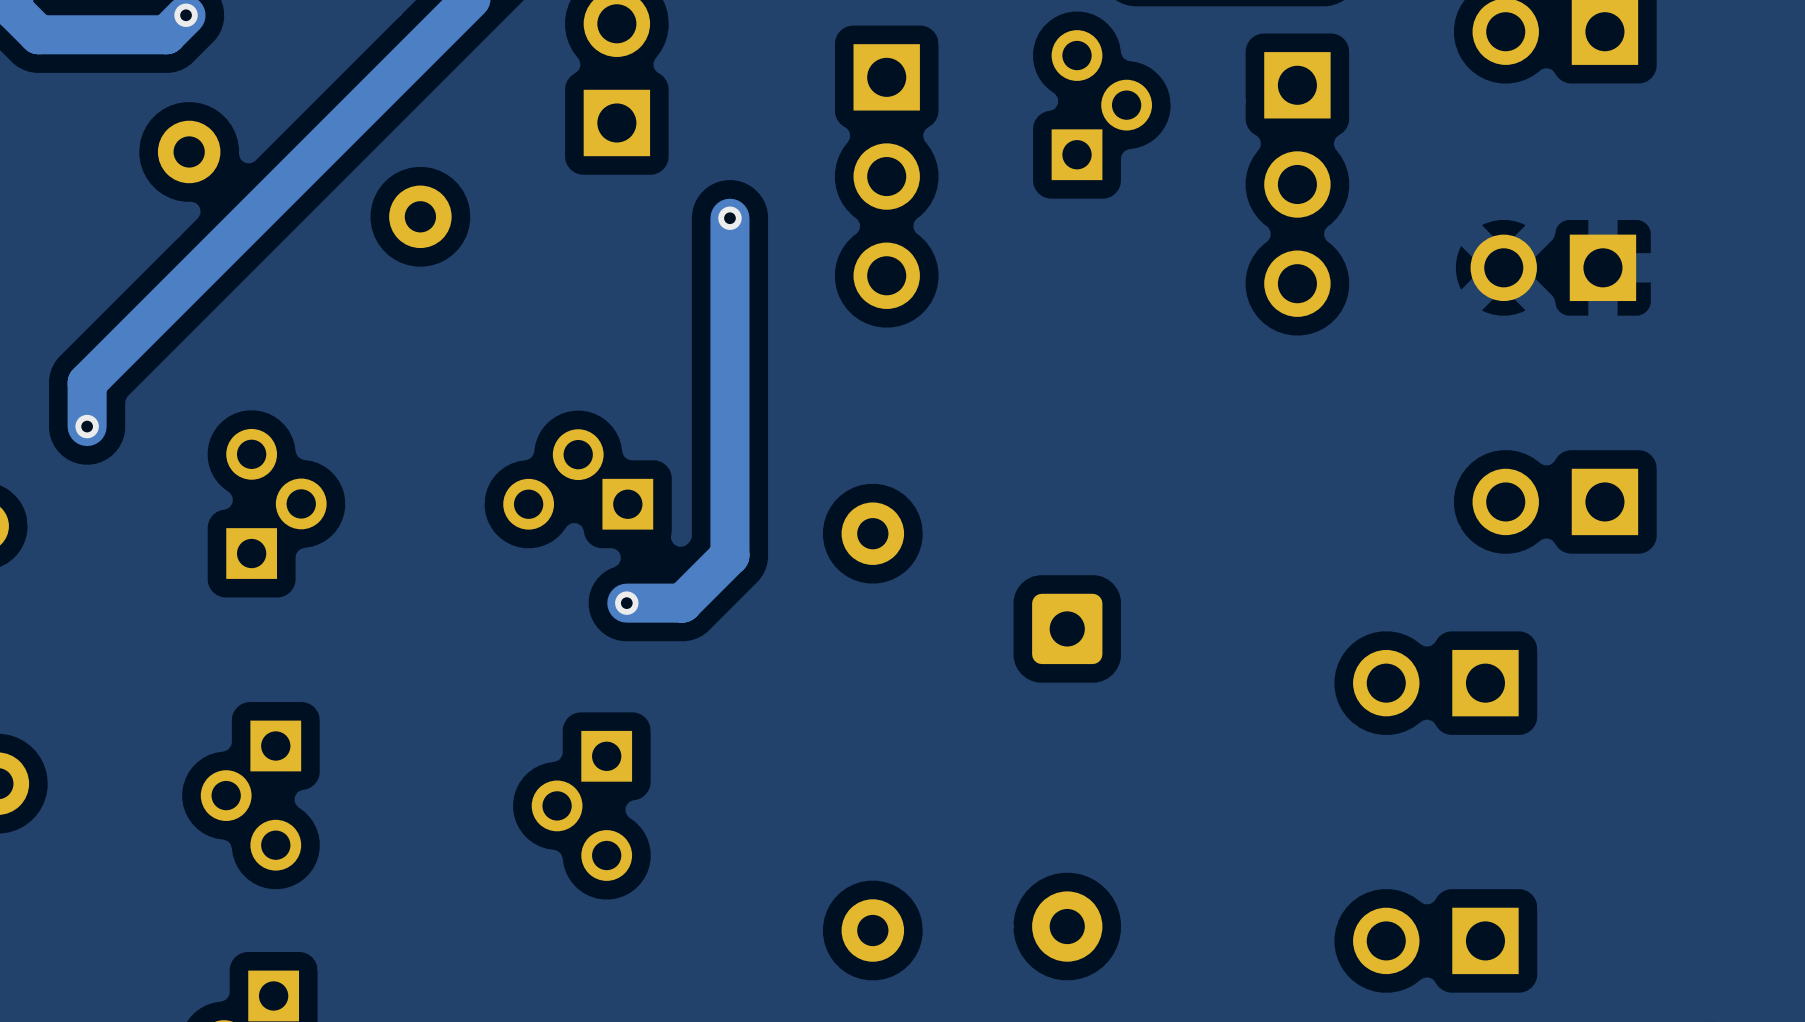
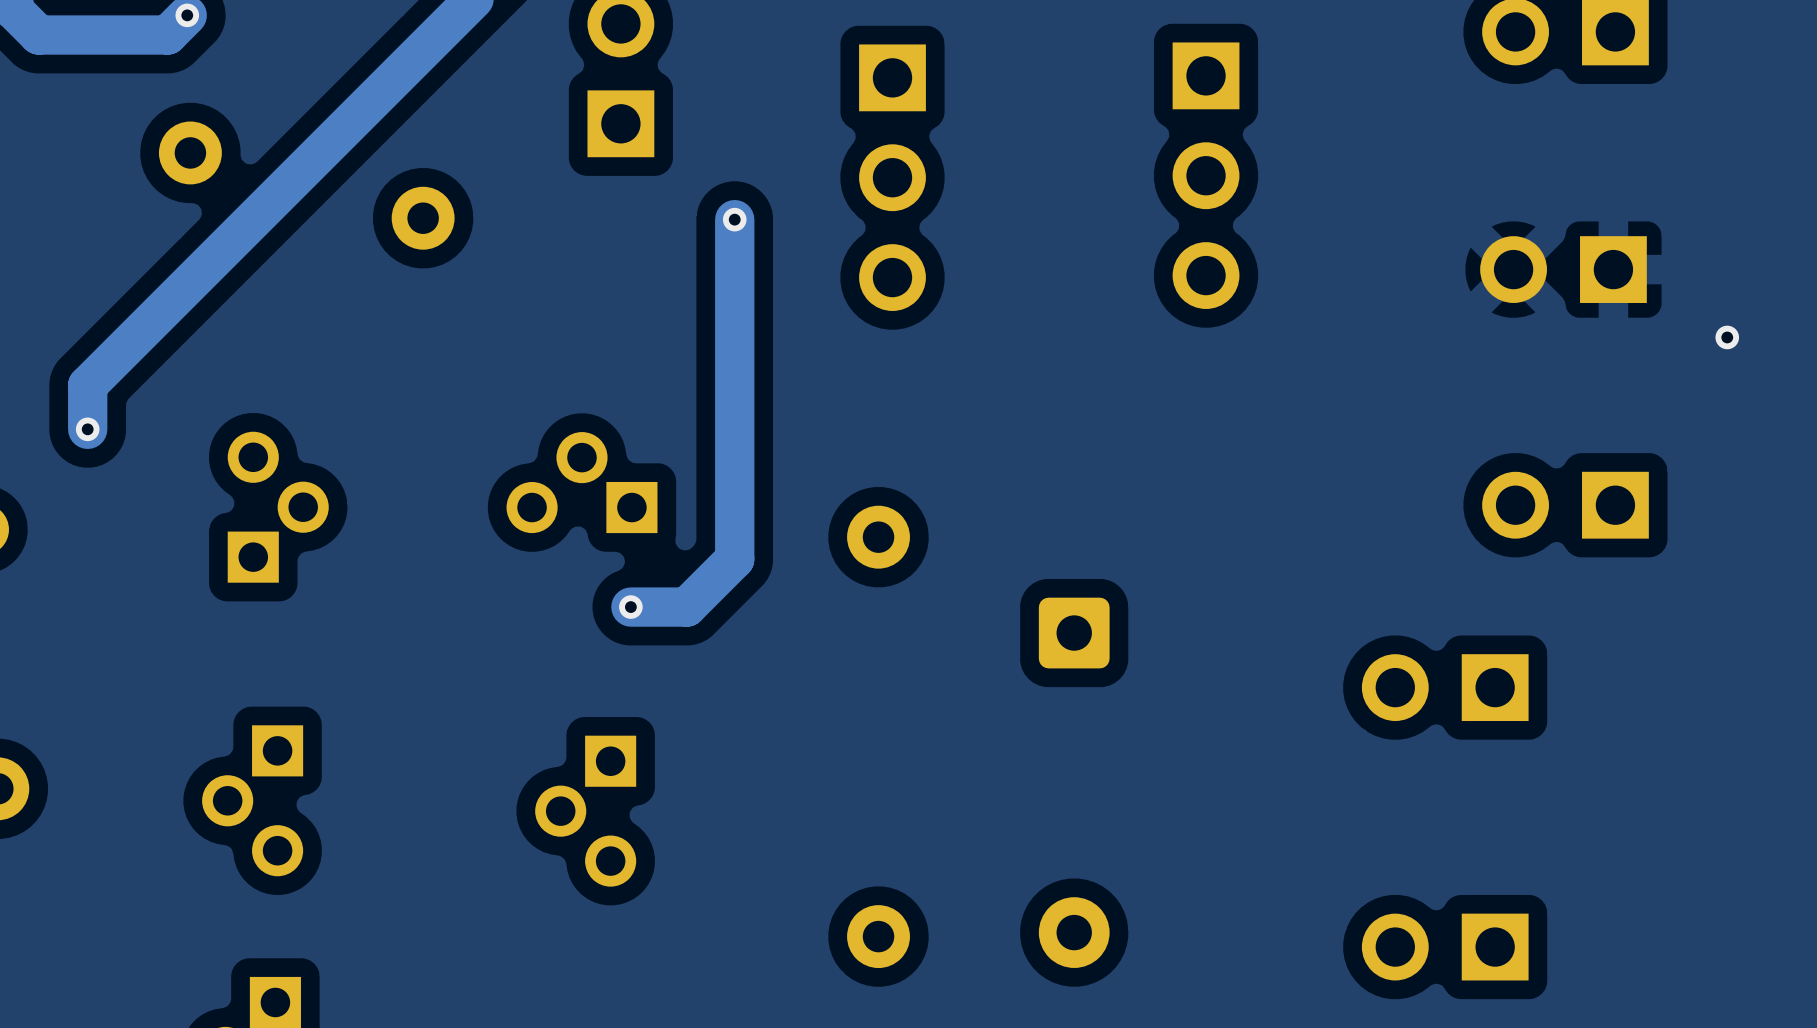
part: (1101, 105) -> none
part position: (1297, 184) -> (1206, 175)
via: none -> (1727, 337)

